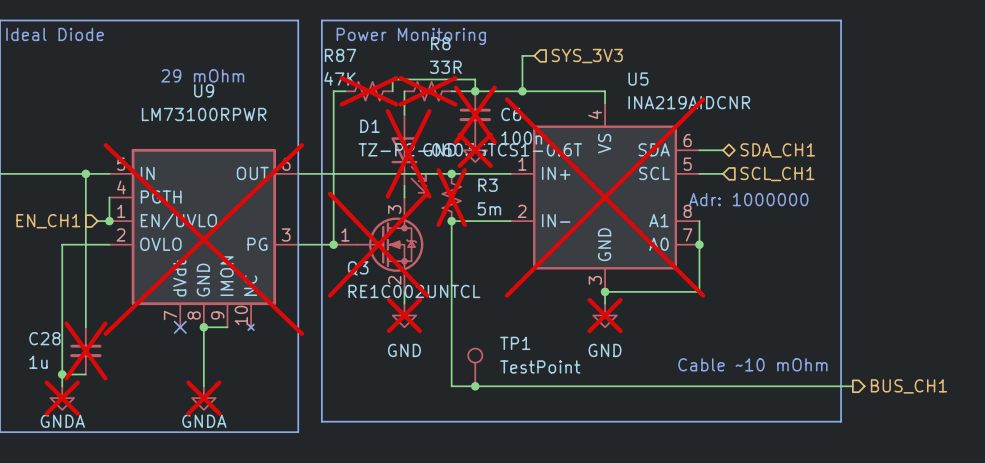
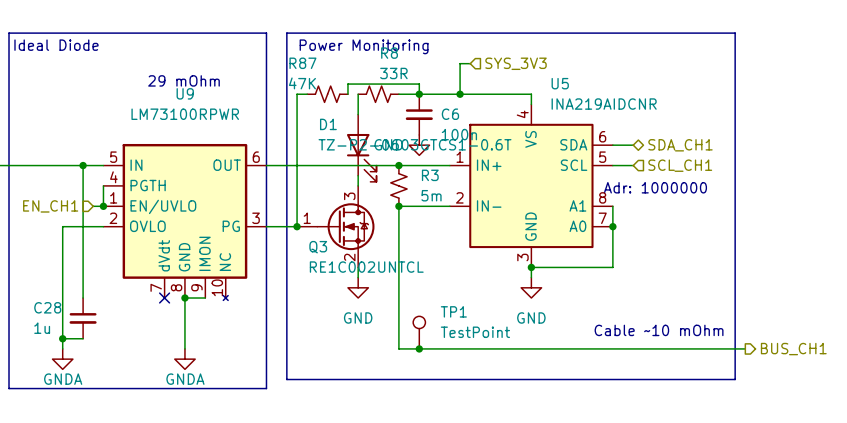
R87 do-not-place cross: (369, 91) -> none
R8 do-not-place cross: (428, 91) -> none
C6 do-not-place cross: (475, 114) -> none
power symbol do-not-place cross: (475, 150) -> none
D1 do-not-place cross: (408, 153) -> none
R3 do-not-place cross: (451, 197) -> none
U5 do-not-place cross: (605, 197) -> none
U9 do-not-place cross: (203, 239) -> none
Q3 do-not-place cross: (378, 244) -> none
power symbol do-not-place cross: (404, 315) -> none
power symbol do-not-place cross: (605, 315) -> none
C28 do-not-place cross: (85, 350) -> none
power symbol do-not-place cross: (62, 398) -> none
power symbol do-not-place cross: (203, 398) -> none

